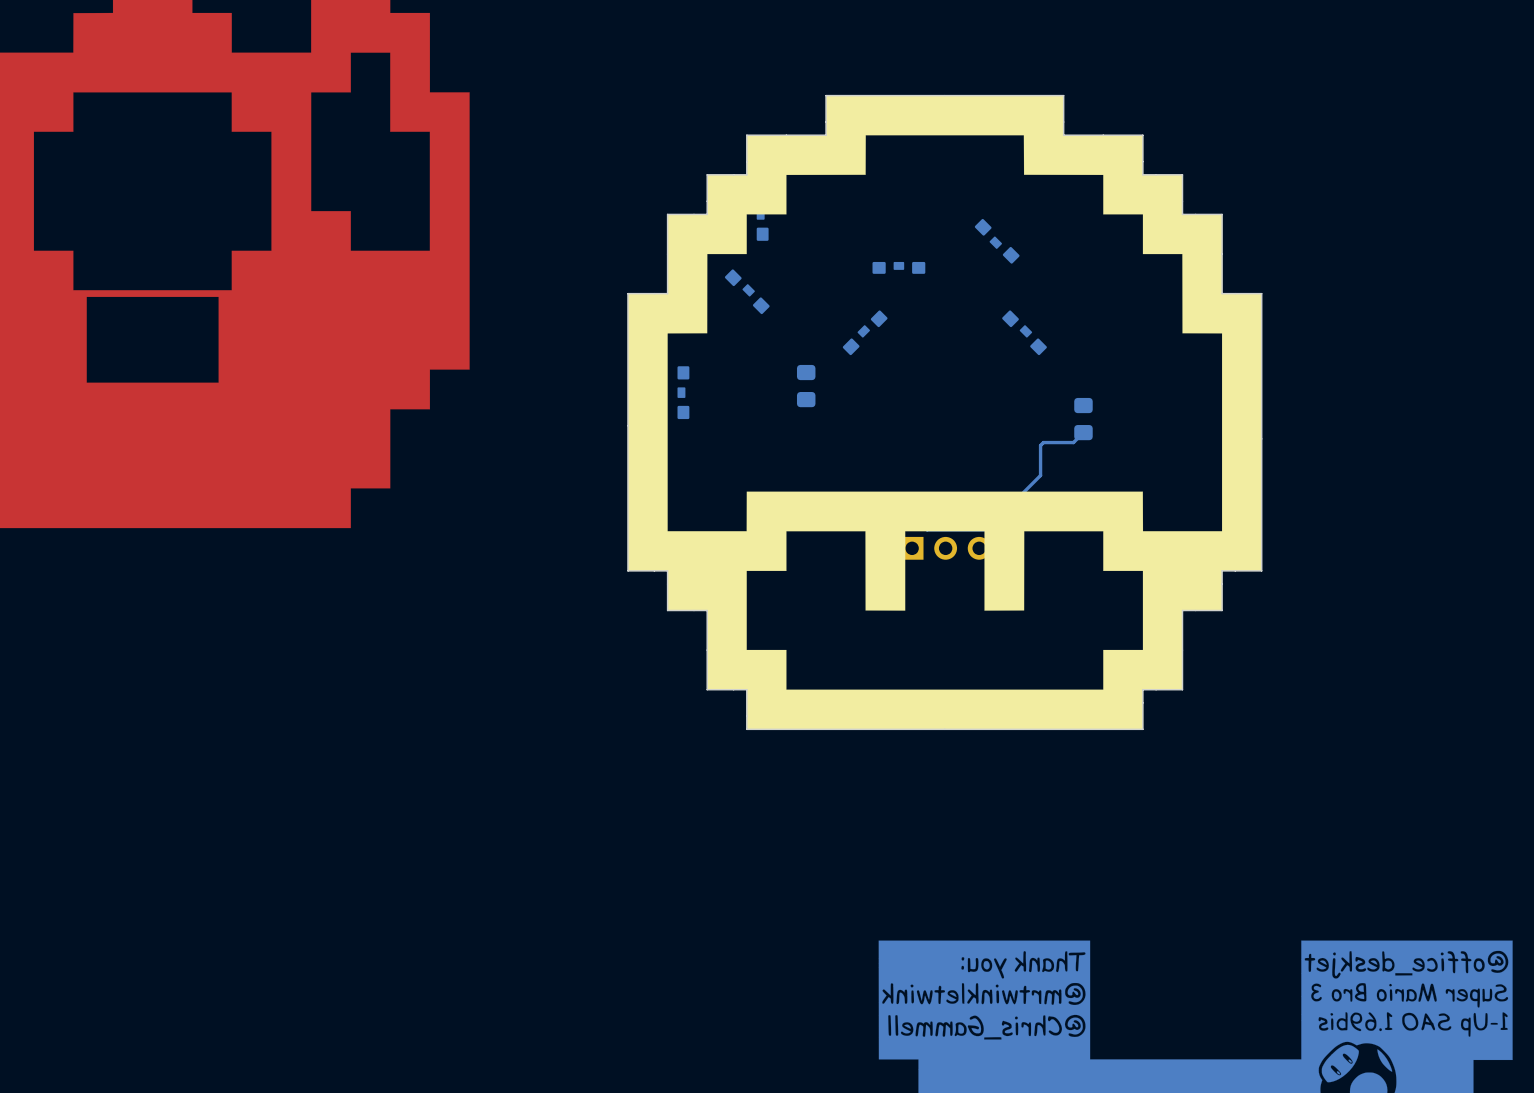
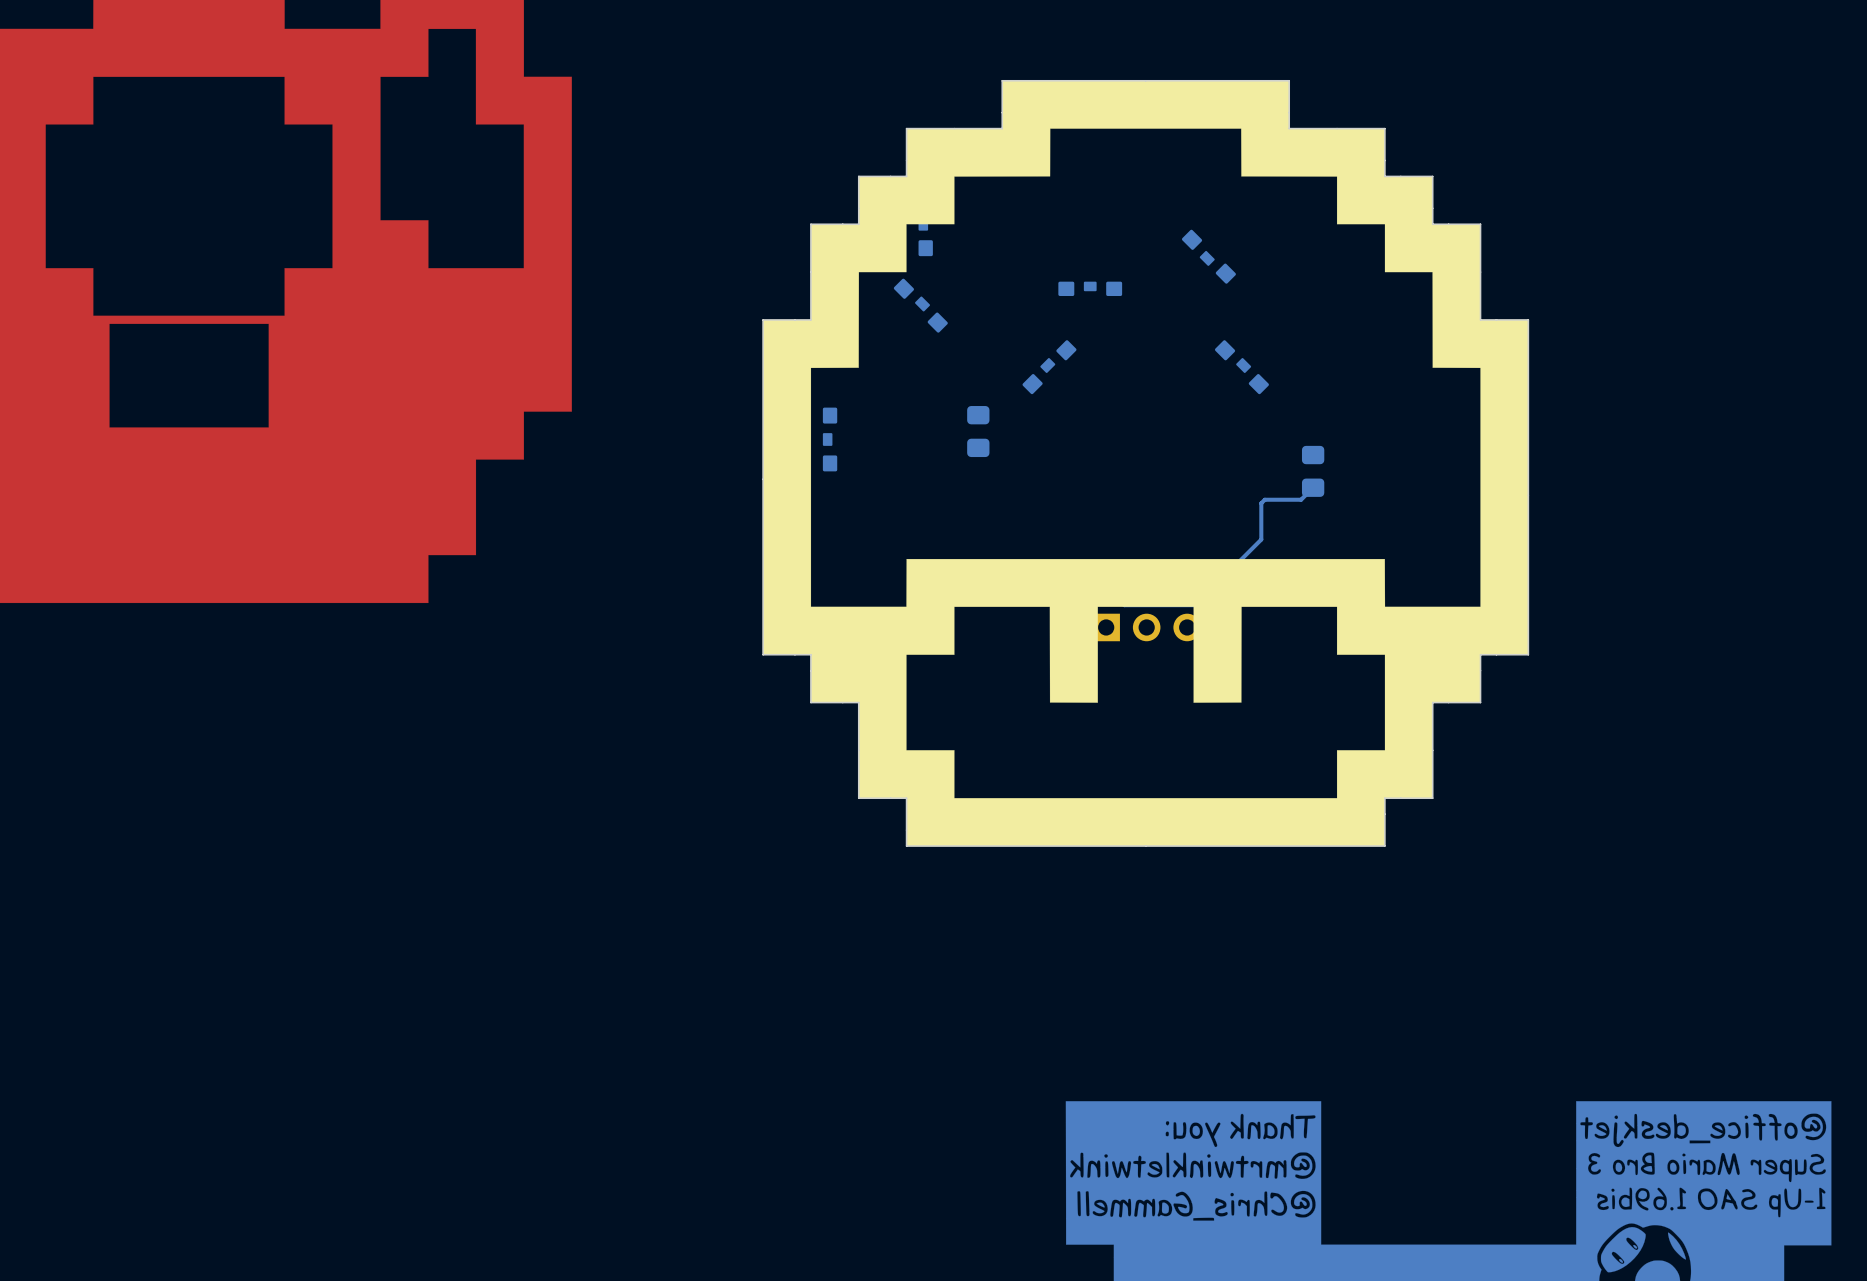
part position: (747, 291) -> (920, 305)

